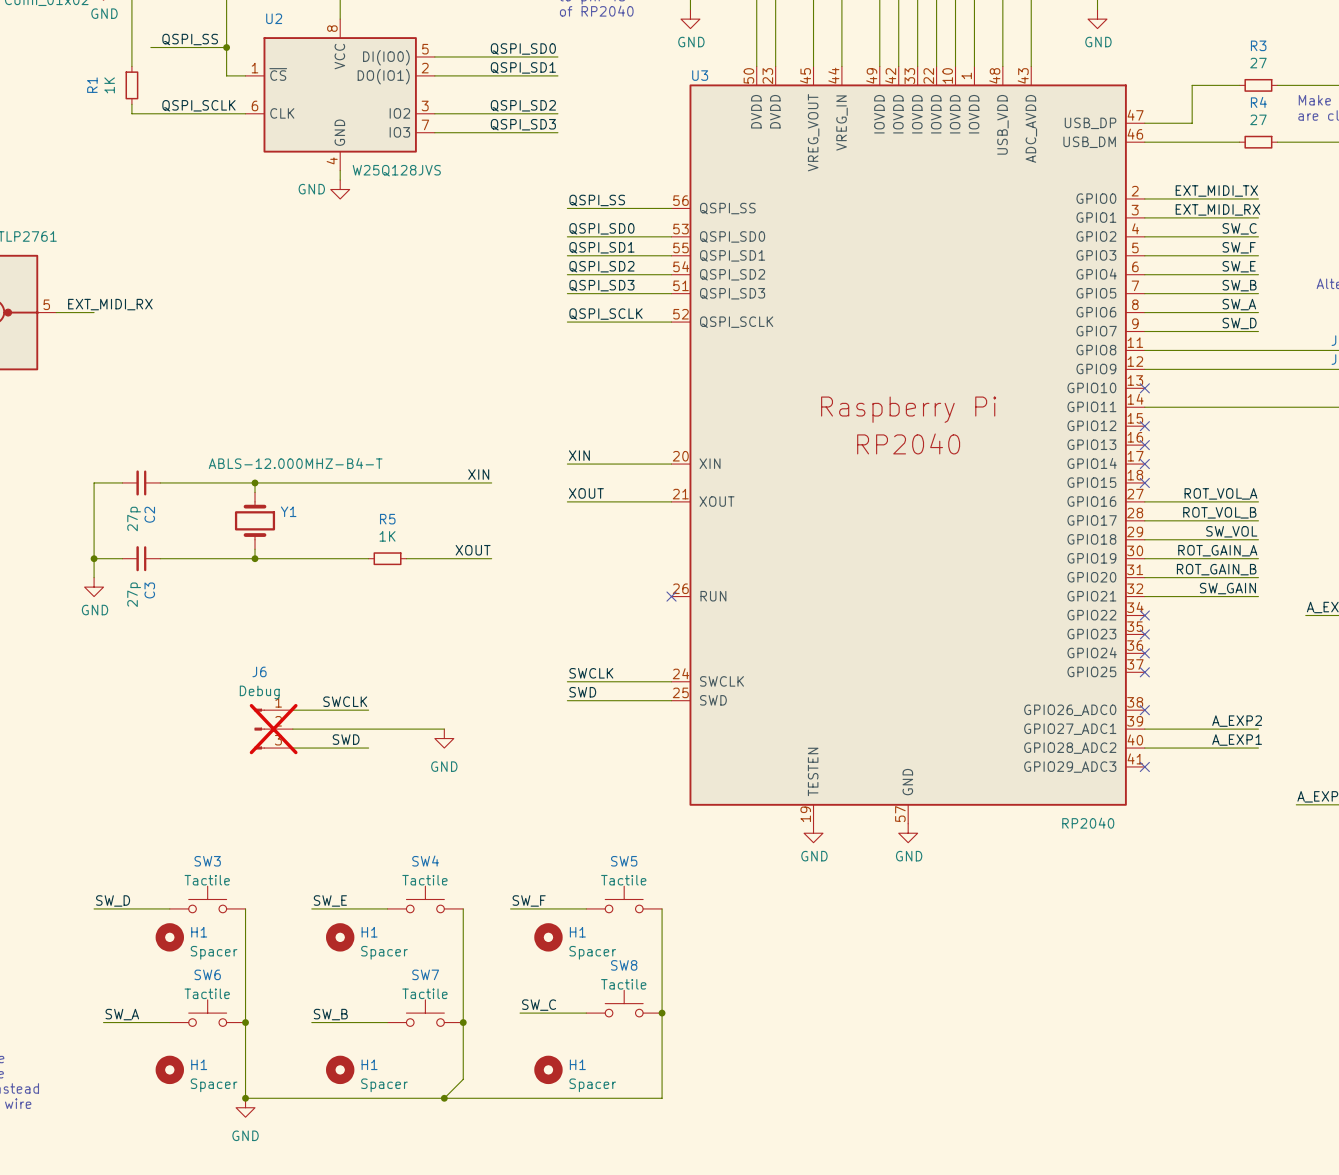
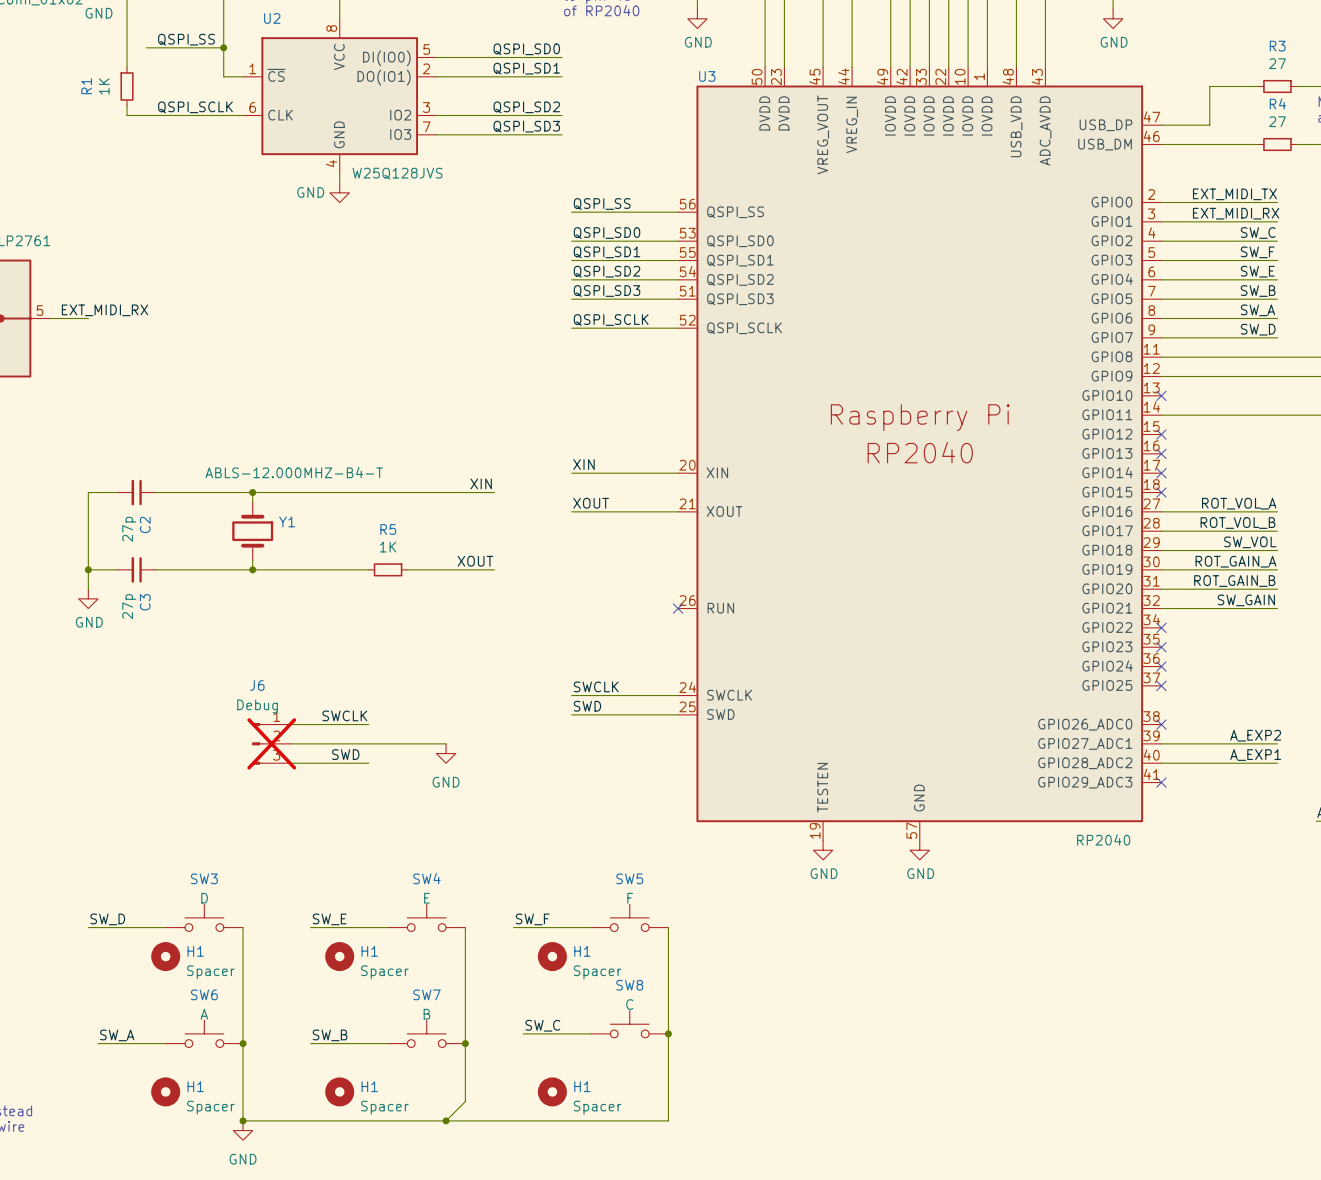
SW3 value: Tactile (207, 880) -> D (204, 898)
SW4 value: Tactile (424, 880) -> E (426, 898)
SW5 value: Tactile (623, 880) -> F (630, 898)
SW8 value: Tactile (623, 984) -> C (629, 1004)
SW6 value: Tactile (207, 993) -> A (204, 1014)
SW7 value: Tactile (424, 993) -> B (426, 1014)

